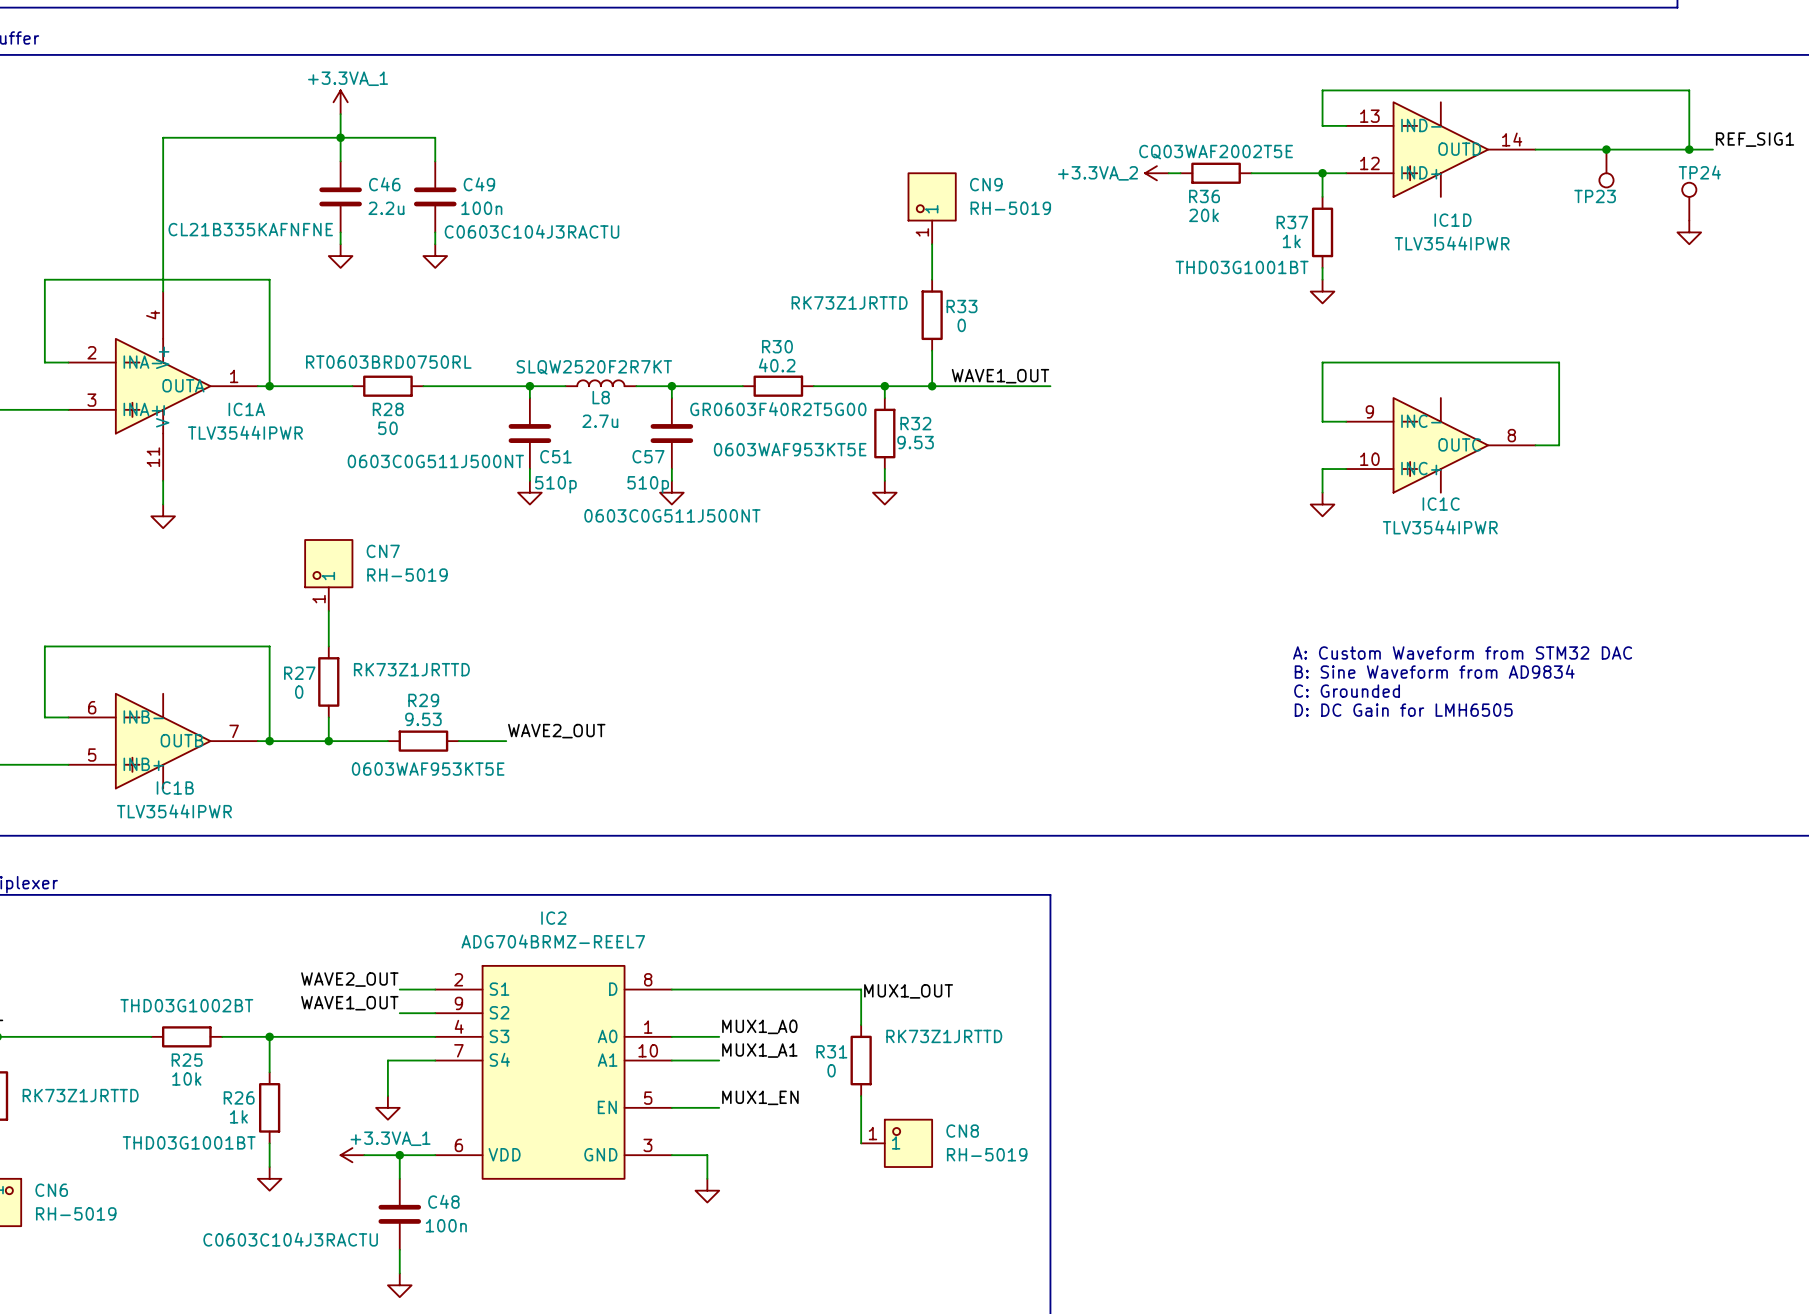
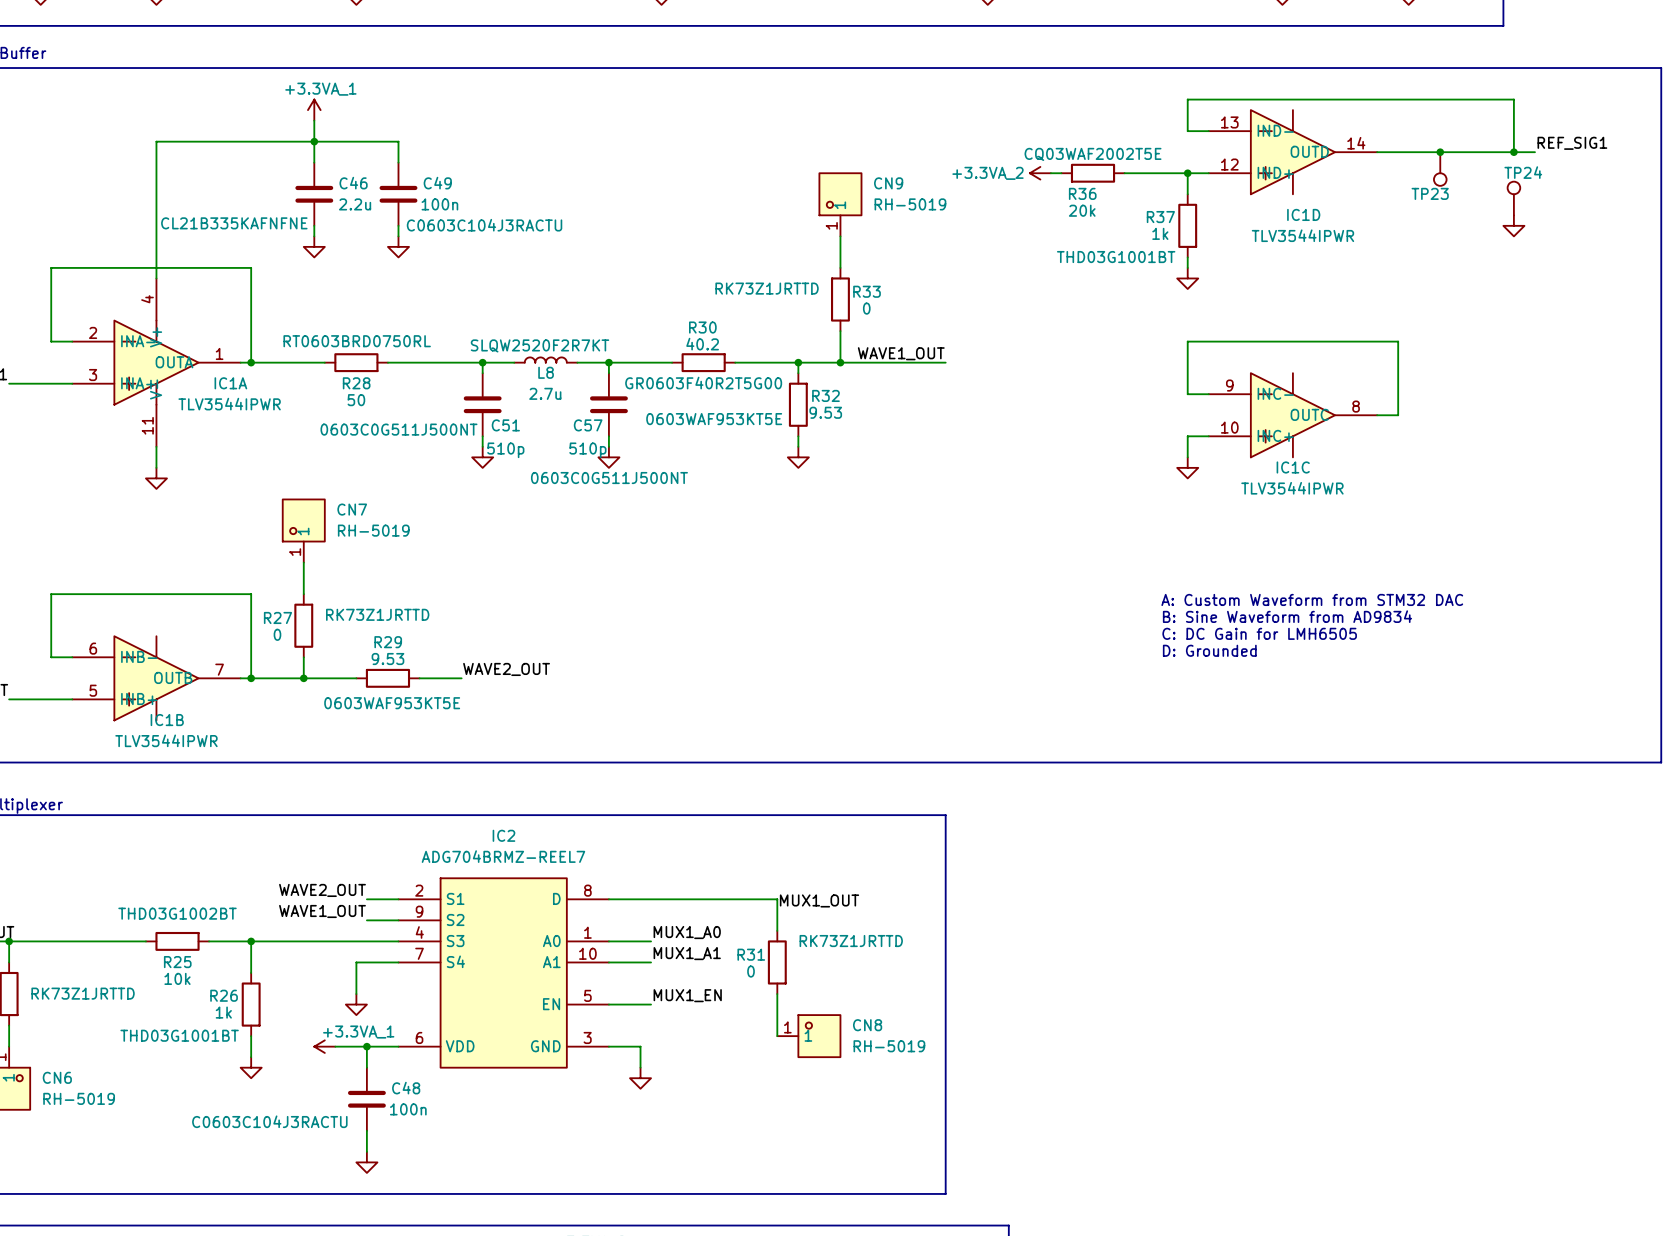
text: C: Grounded (1347, 691) -> C: DC Gain for LMH6505 (1259, 633)
text: D: DC Gain for LMH6505 (1403, 710) -> D: Grounded (1209, 650)

